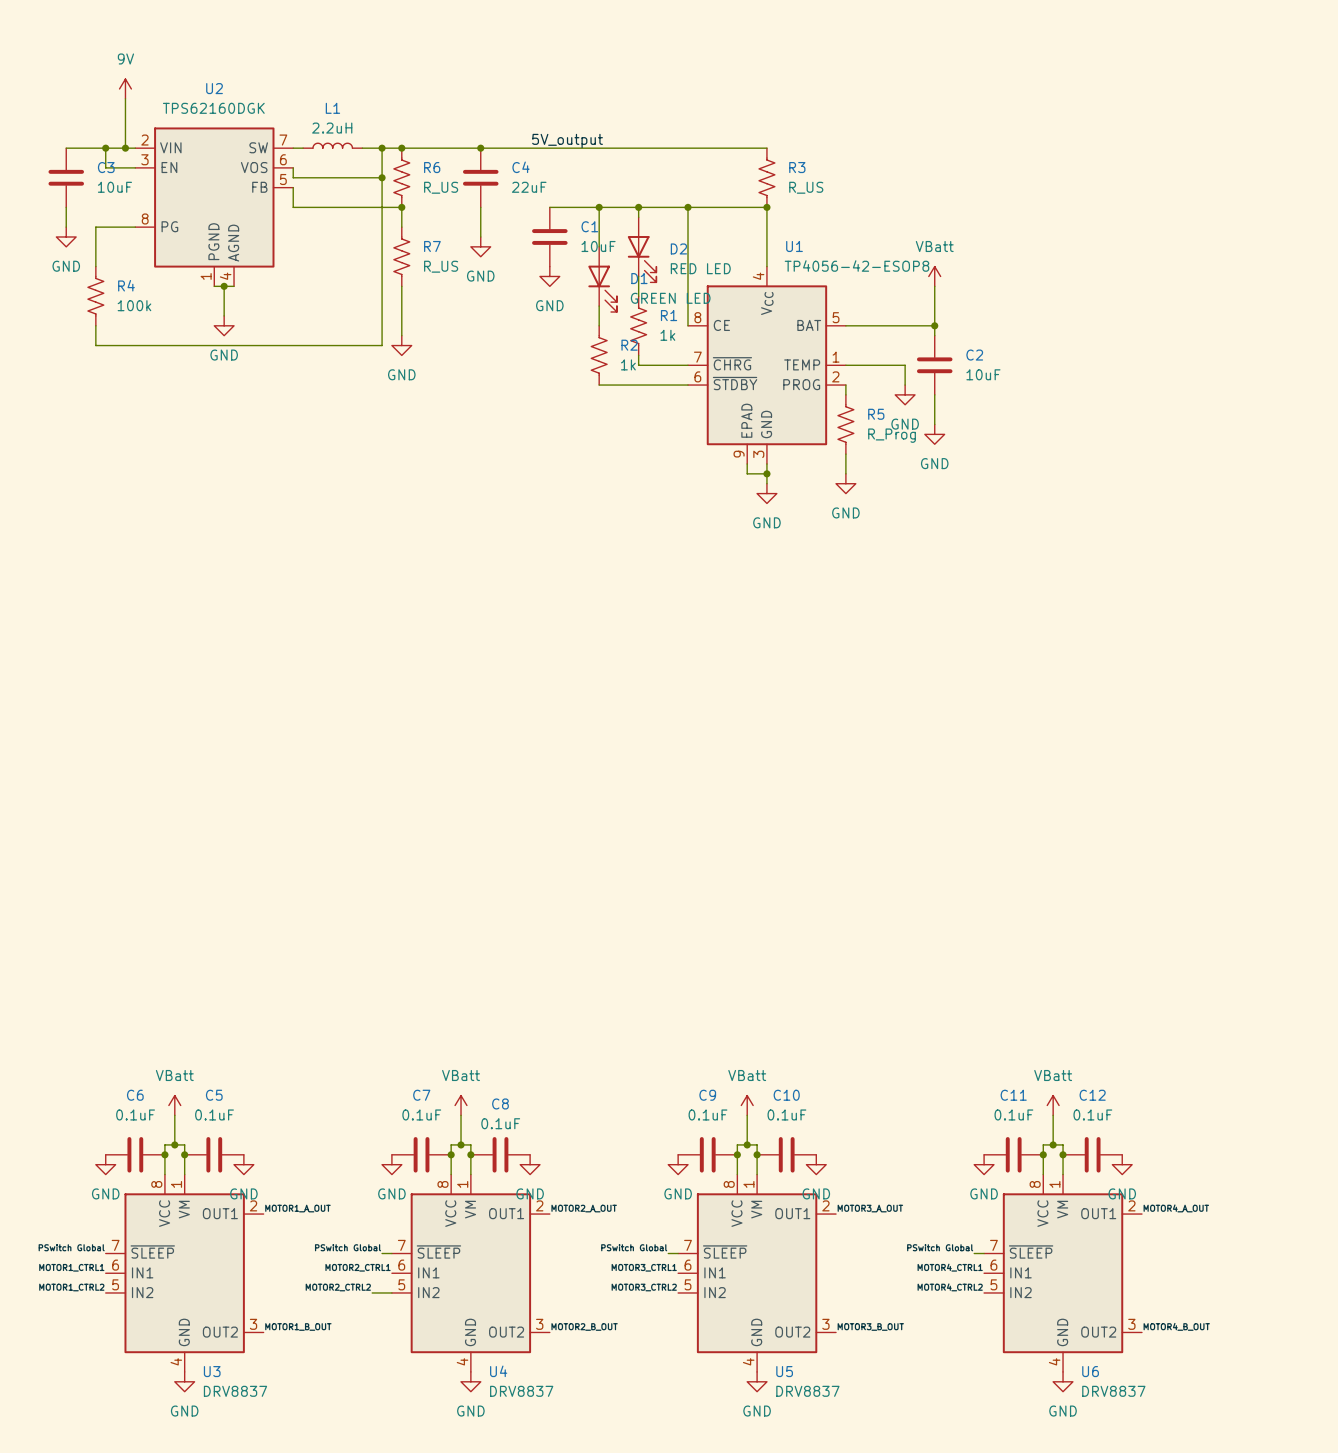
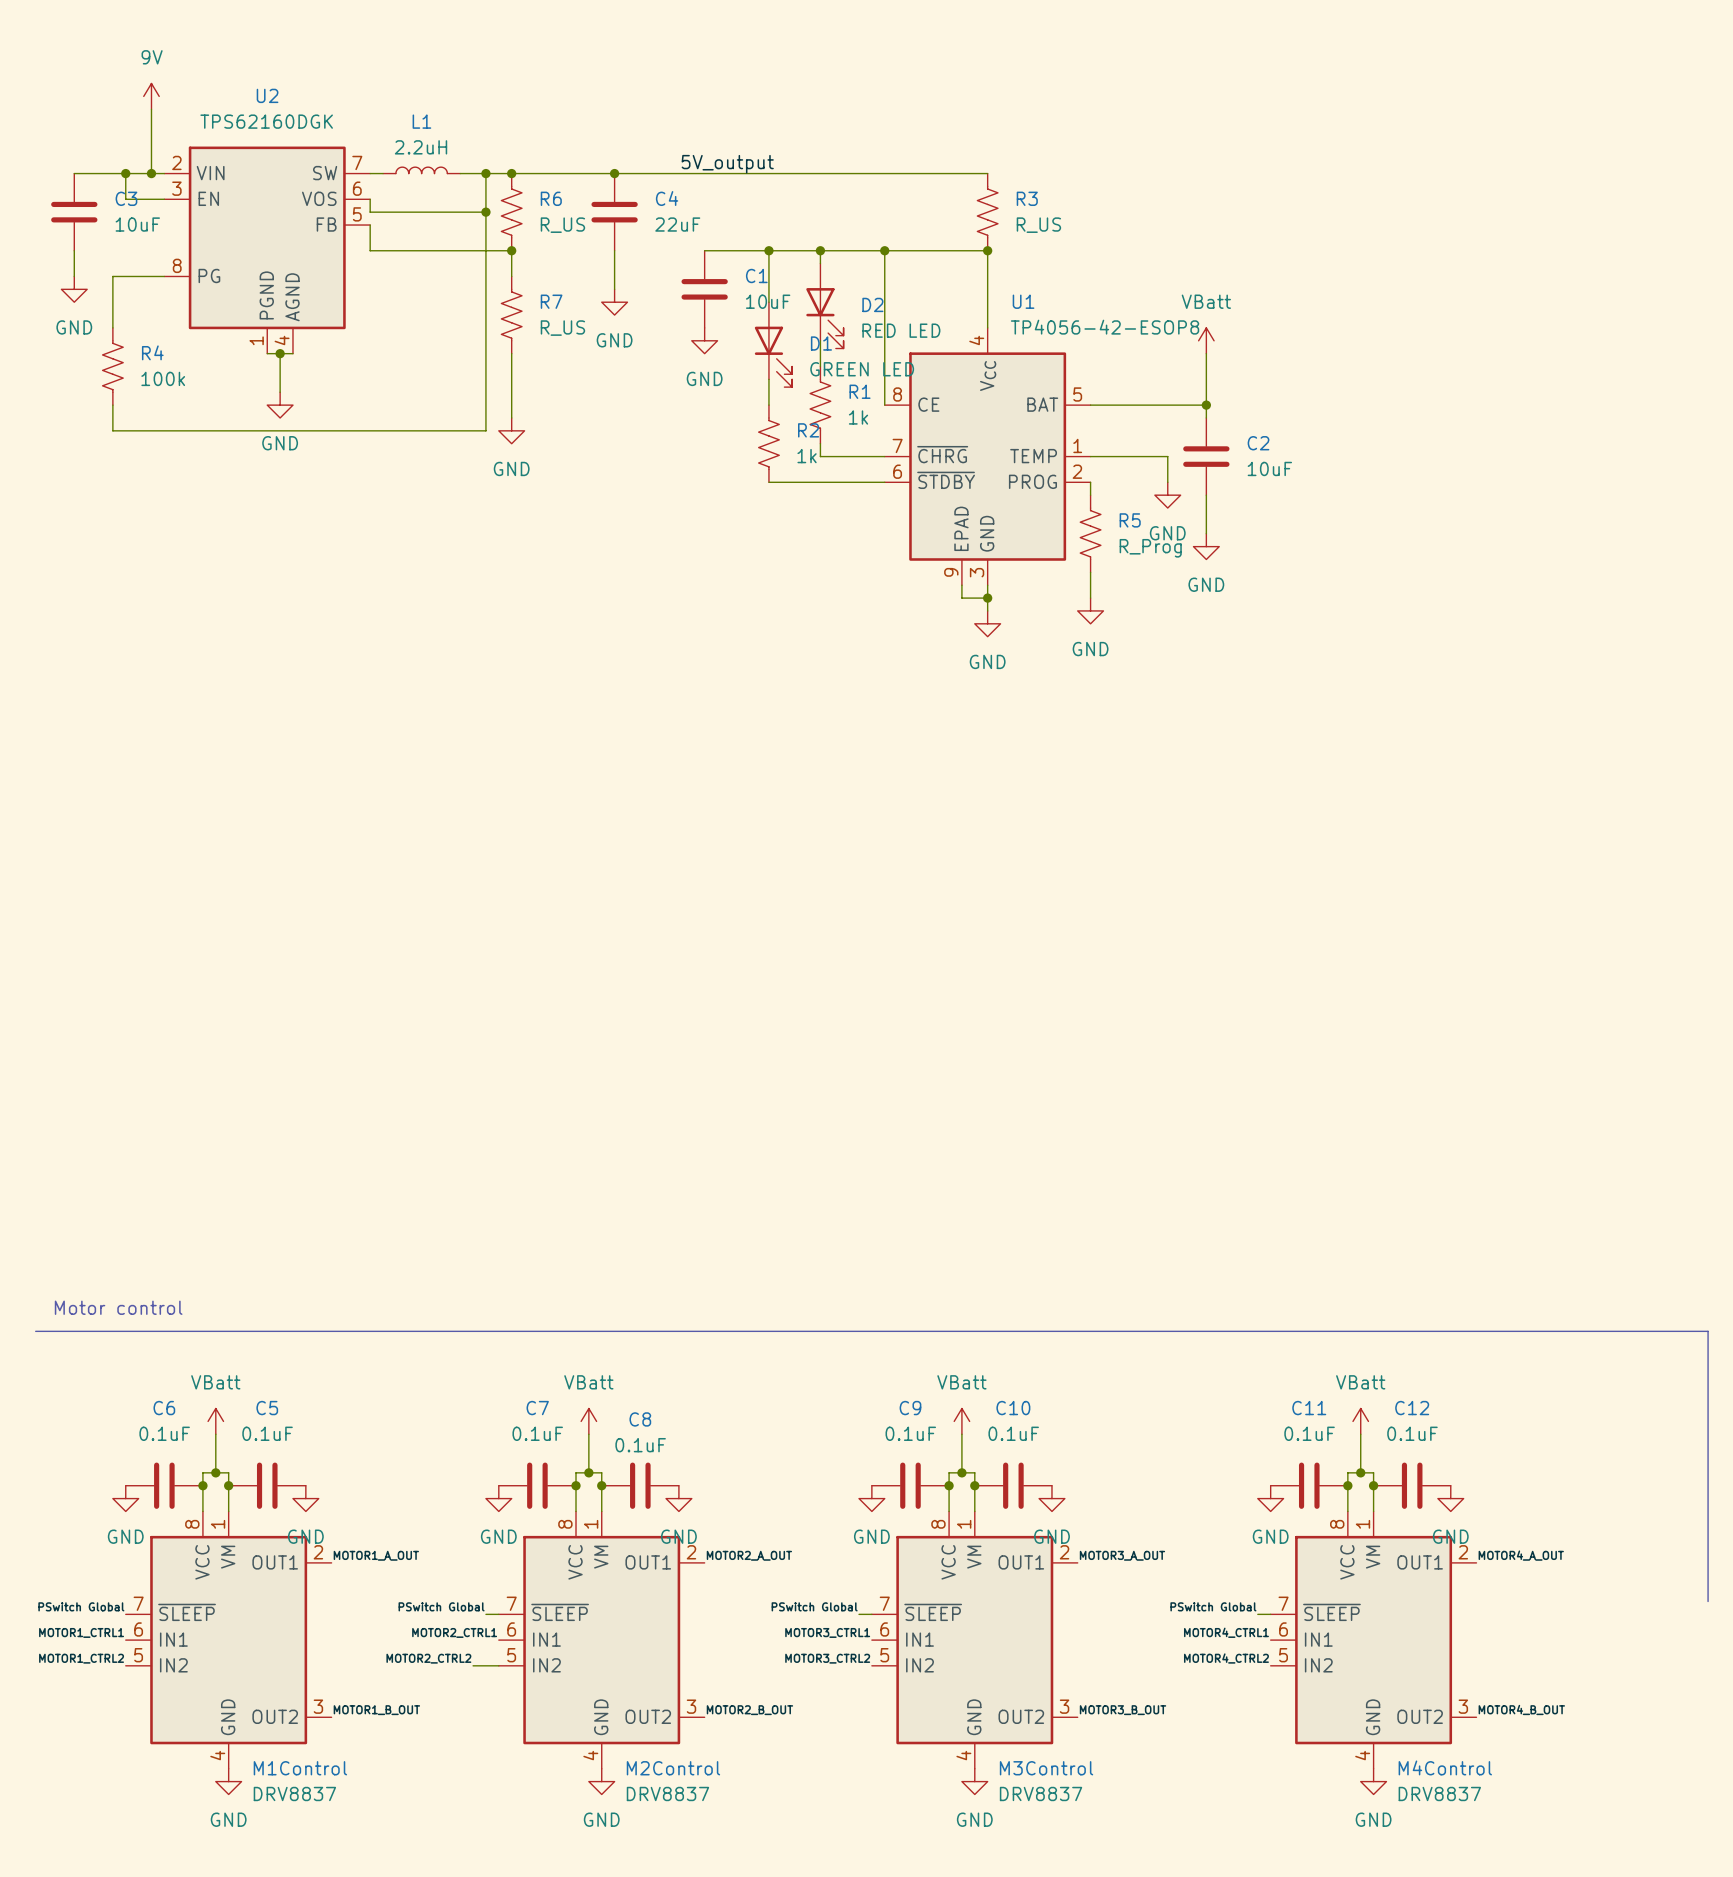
text: none -> Motor control (118, 1307)
line: none -> (35, 1331) (1708, 1331) (1708, 1601)
U3 name: U3 (212, 1371) -> M1Control (300, 1768)
U4 name: U4 (498, 1371) -> M2Control (673, 1768)
U5 name: U5 (784, 1371) -> M3Control (1046, 1768)
U6 name: U6 (1090, 1371) -> M4Control (1445, 1767)

